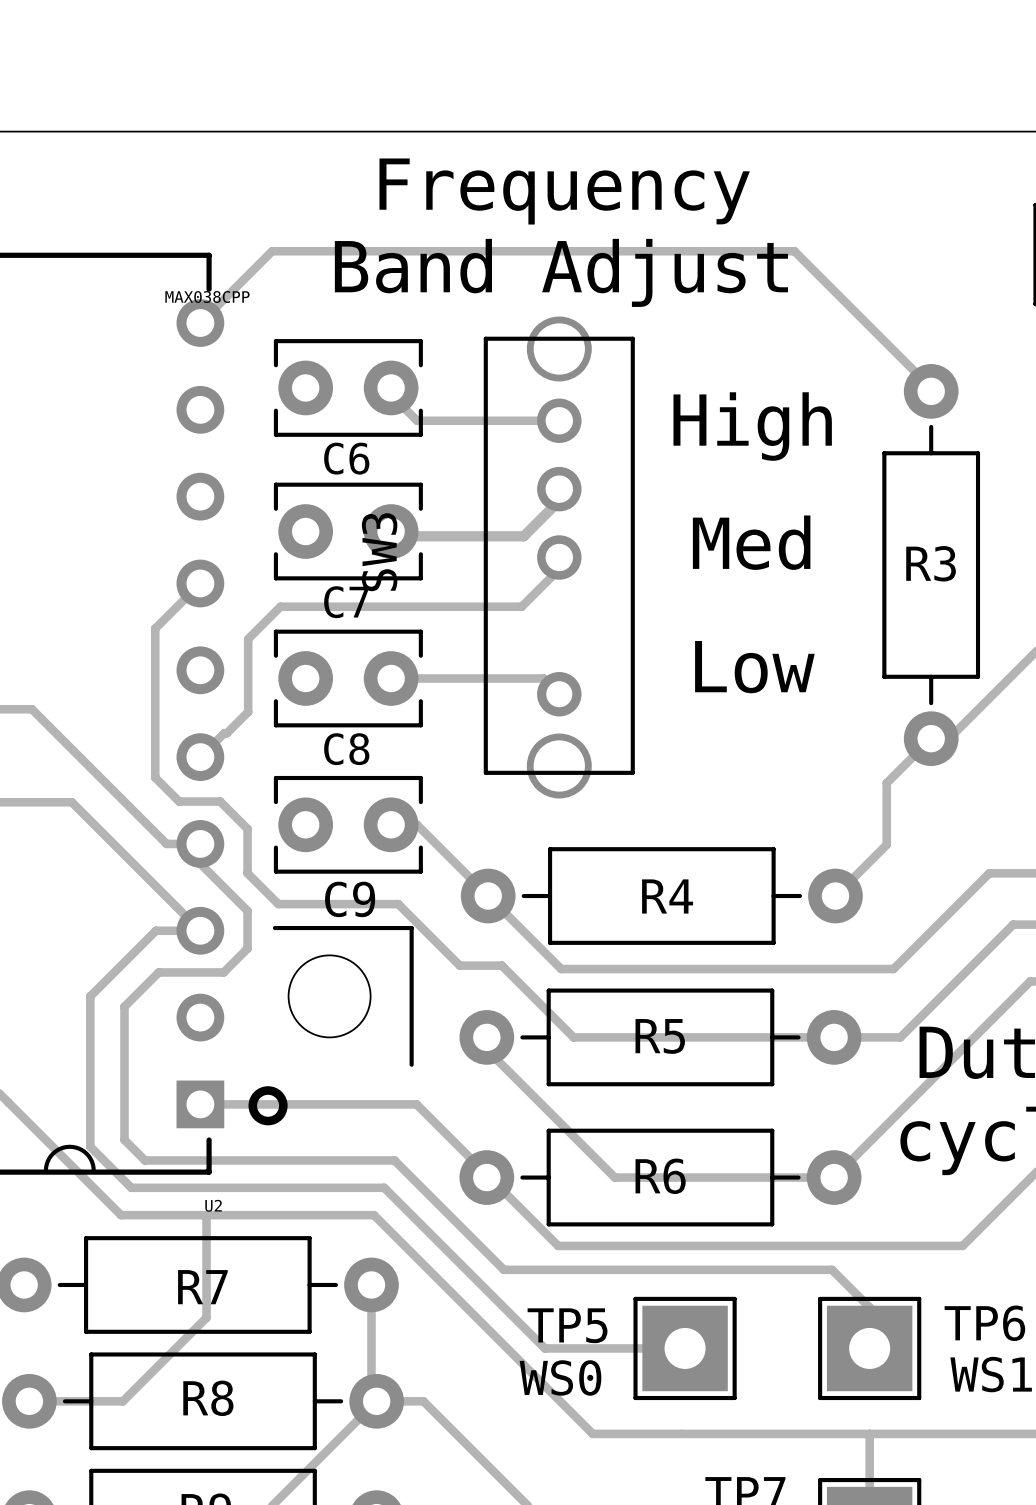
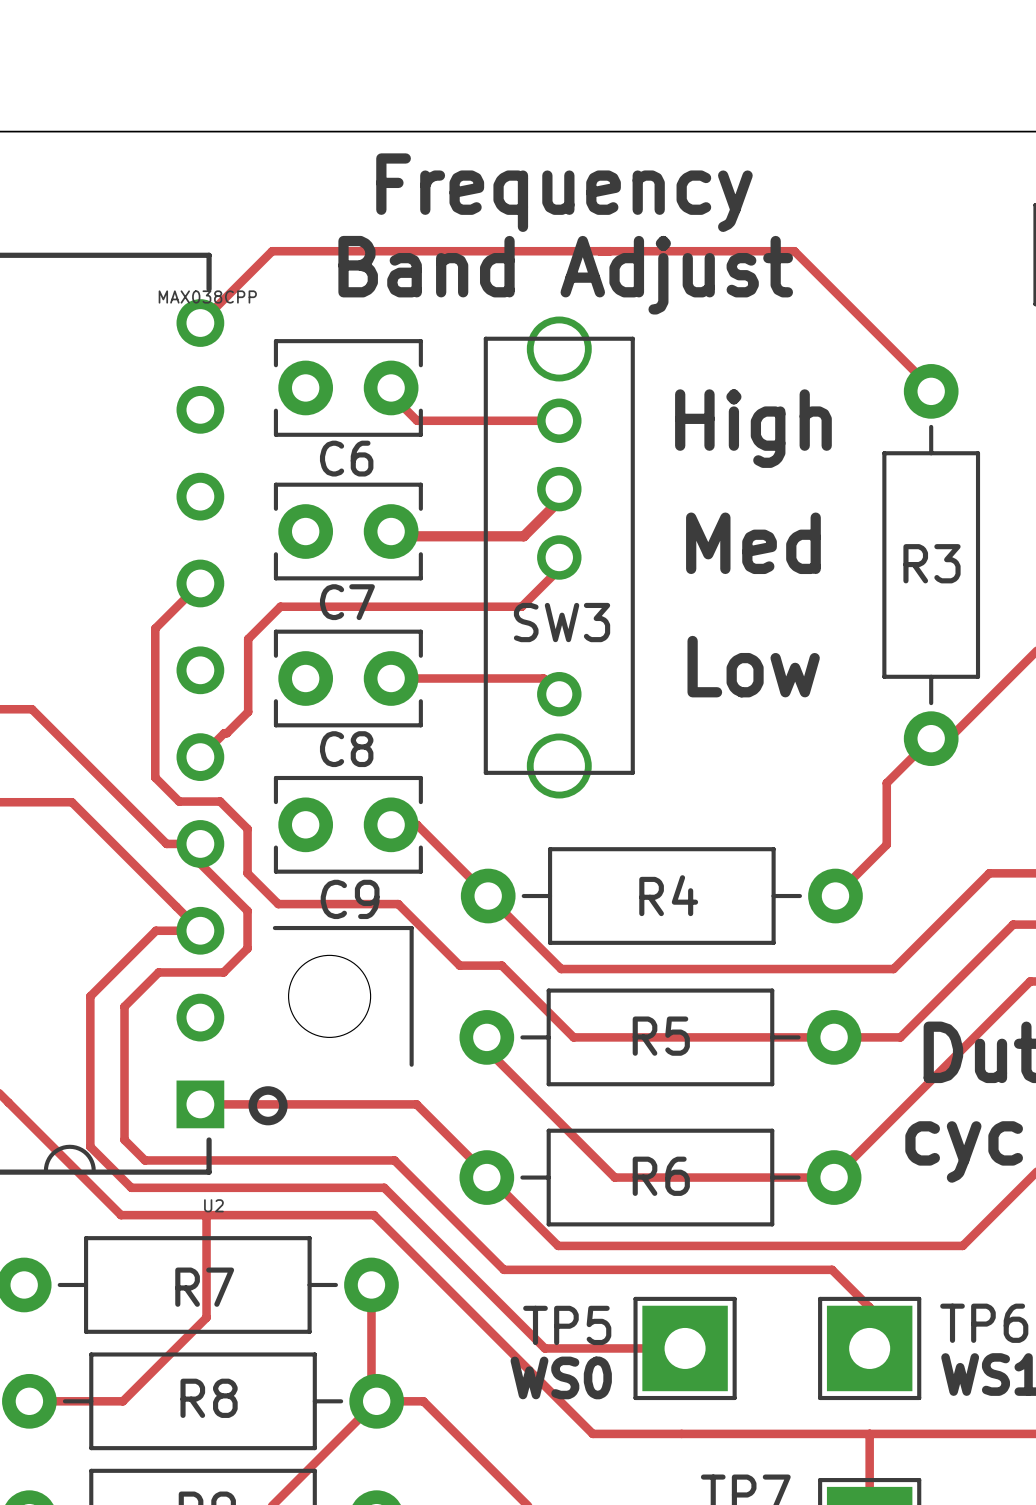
SW3 name rotation: 0° (379, 552) -> 90° clockwise (562, 622)
SW3 name position: SW3 (379, 552) -> SW3 (562, 622)

